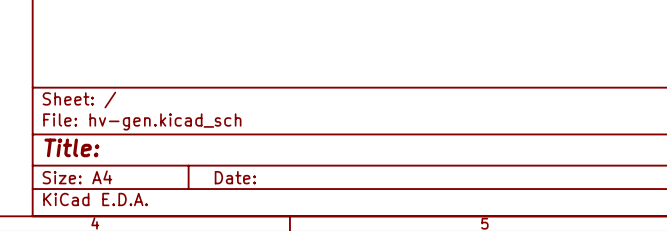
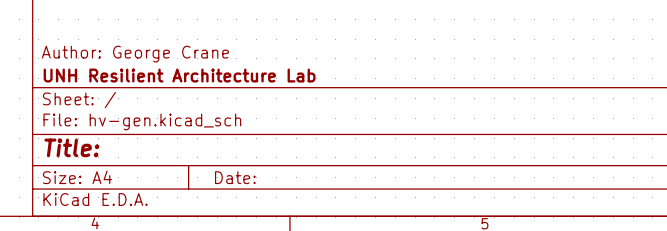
title block: none -> Author: George Crane (135, 54)
title block: none -> UNH Resilient Architecture Lab (179, 75)

